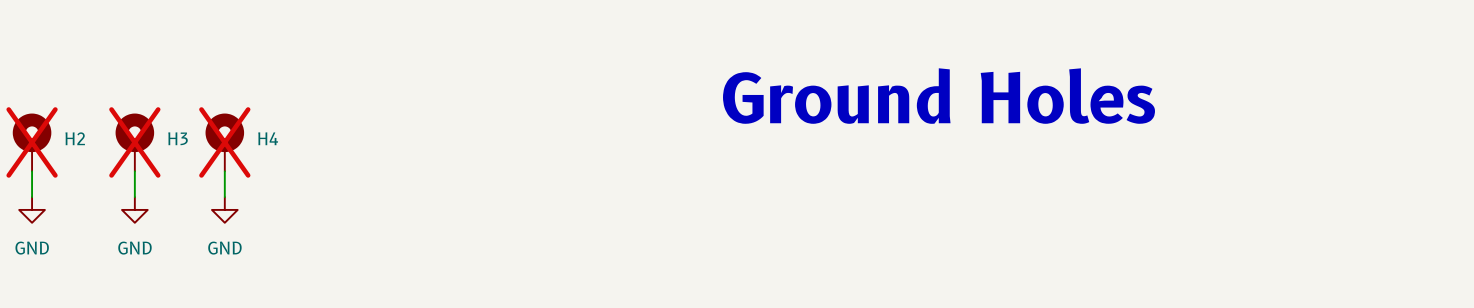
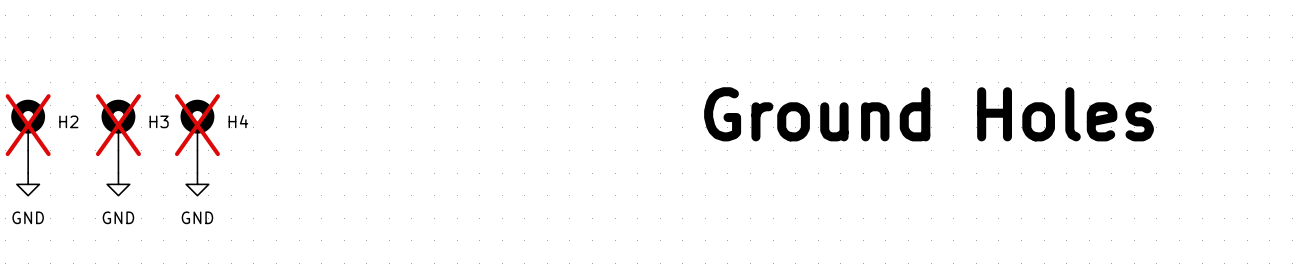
text: Ground Holes (939, 96) -> none
label: none -> Ground Holes (929, 114)

